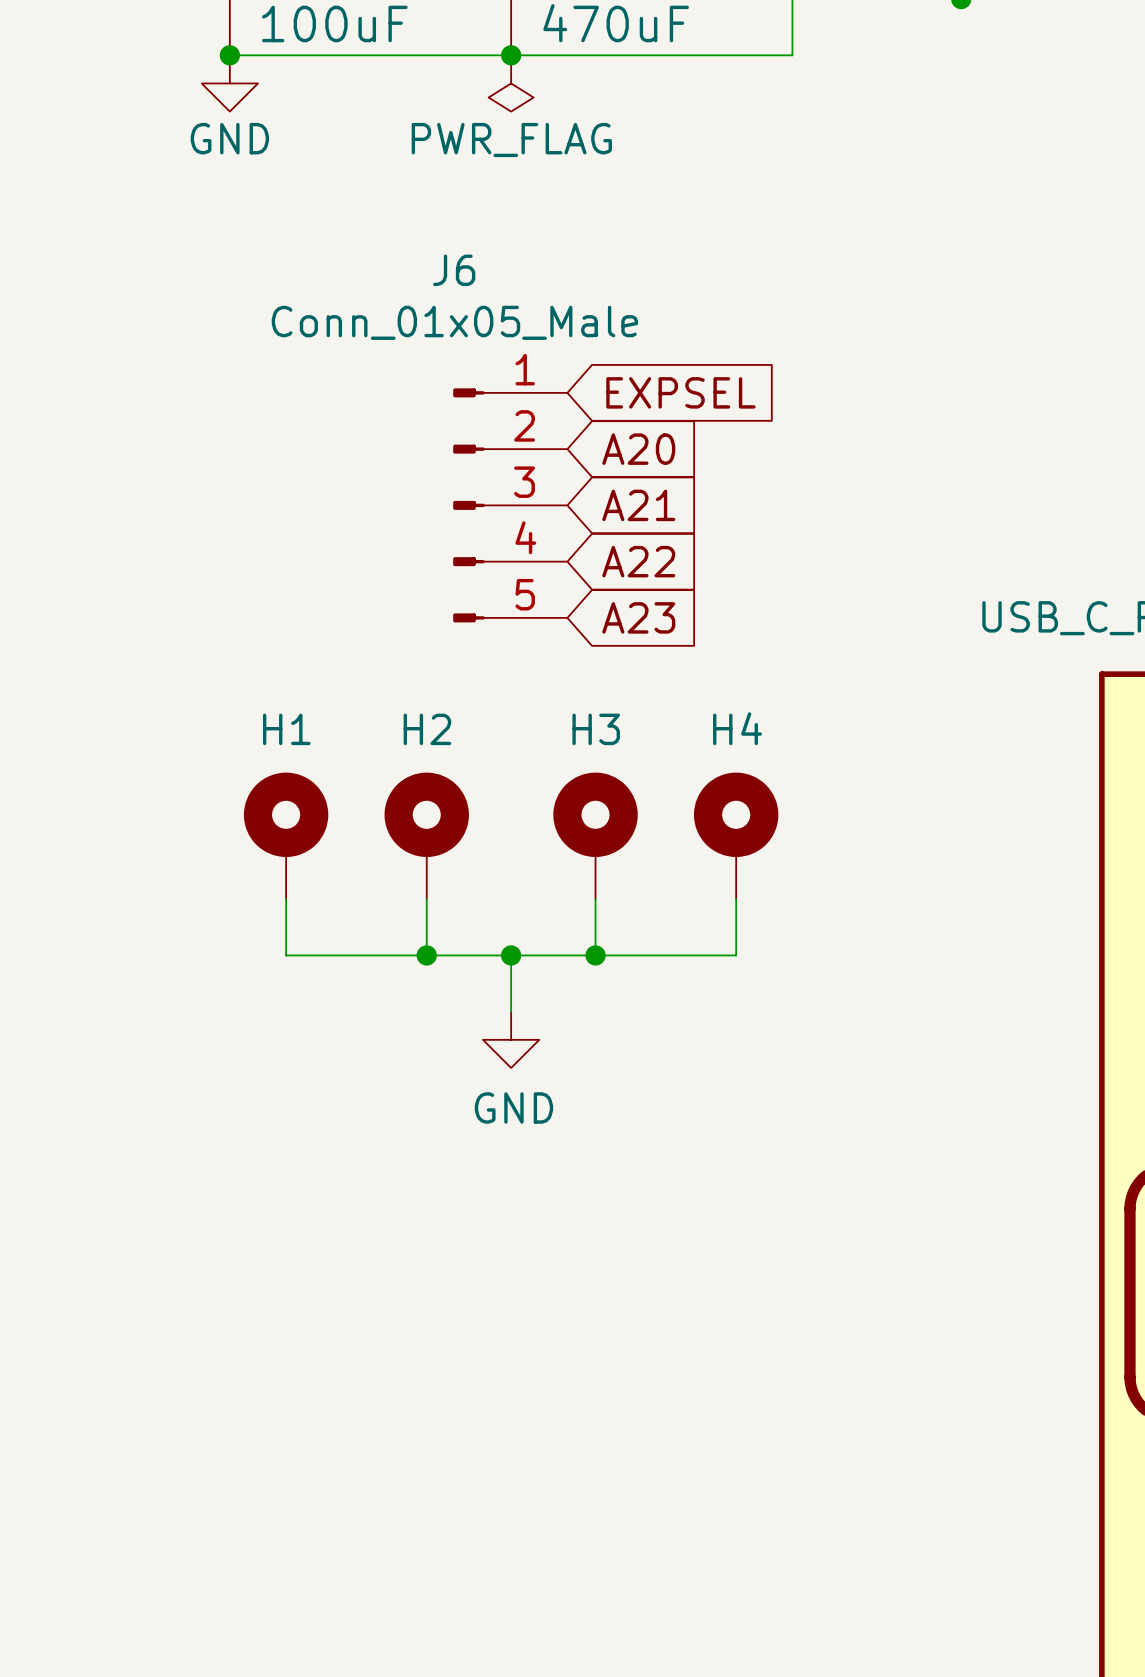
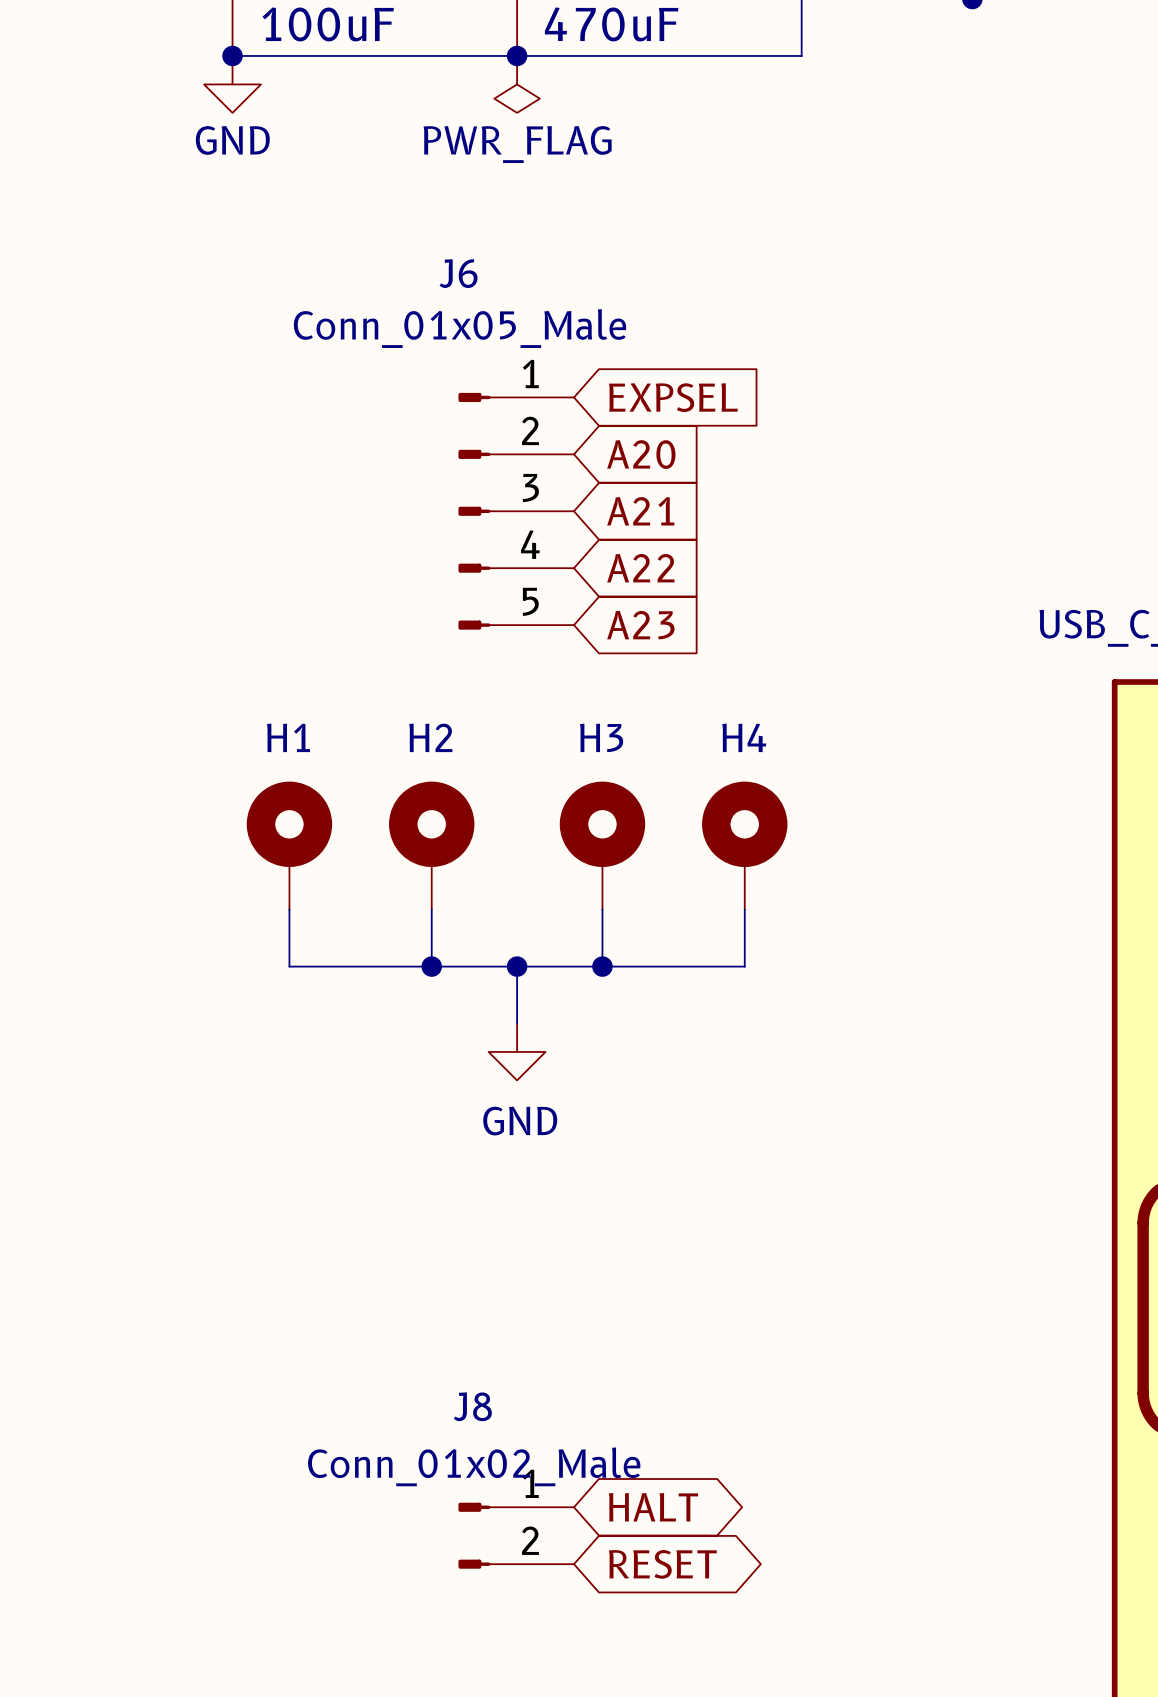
global label: none -> HALT (653, 1507)
J8: none -> Conn_01x02_Male (516, 1535)
global label: none -> RESET (662, 1564)

